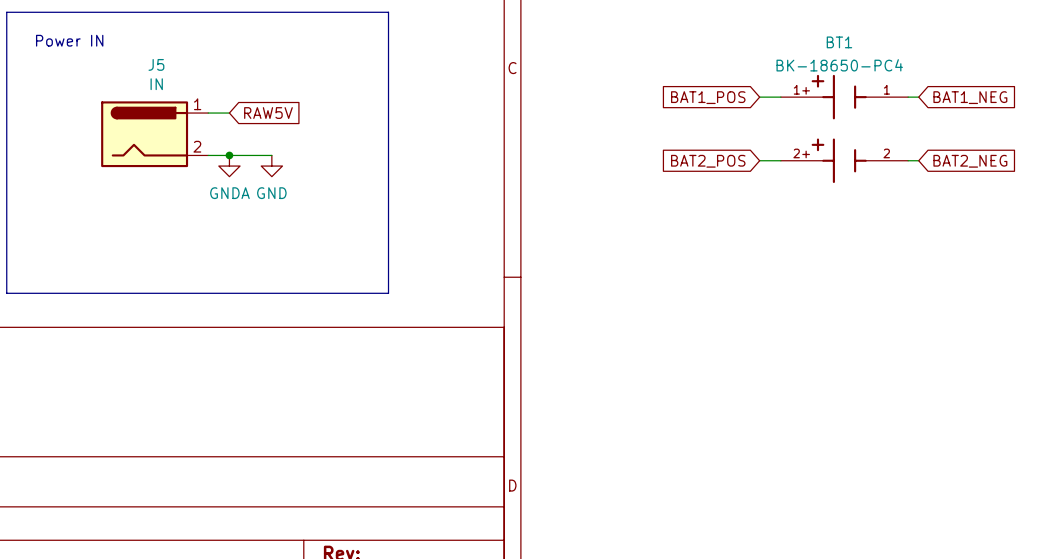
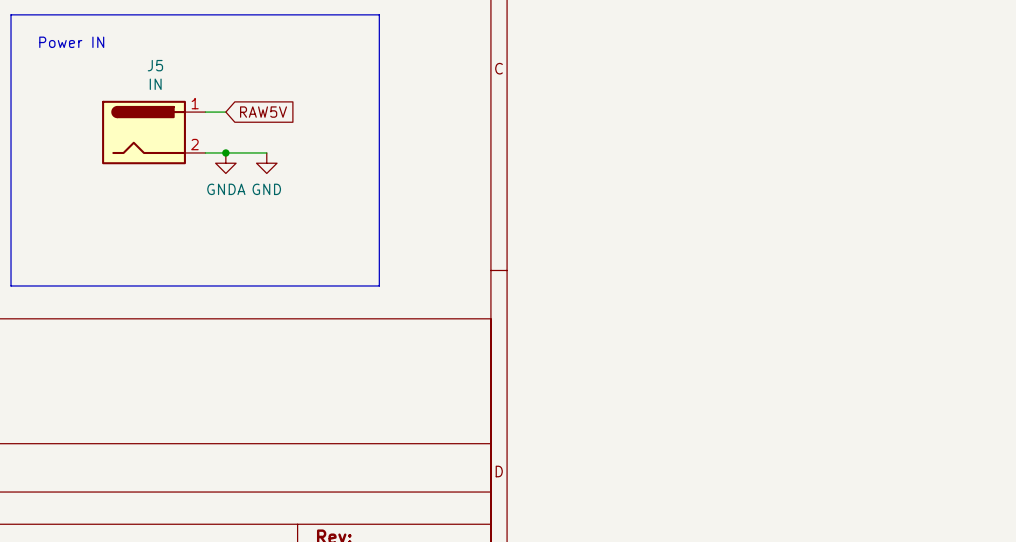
global label: BAT1_POS (708, 97) -> none
wire: (759, 97) (780, 97) -> none
wire: (908, 97) (918, 97) -> none
global label: BAT1_NEG (970, 97) -> none
BT1: BK-18650-PC4 (844, 128) -> none
wire: (759, 160) (780, 160) -> none
wire: (908, 160) (918, 160) -> none
global label: BAT2_POS (708, 161) -> none
global label: BAT2_NEG (970, 161) -> none

